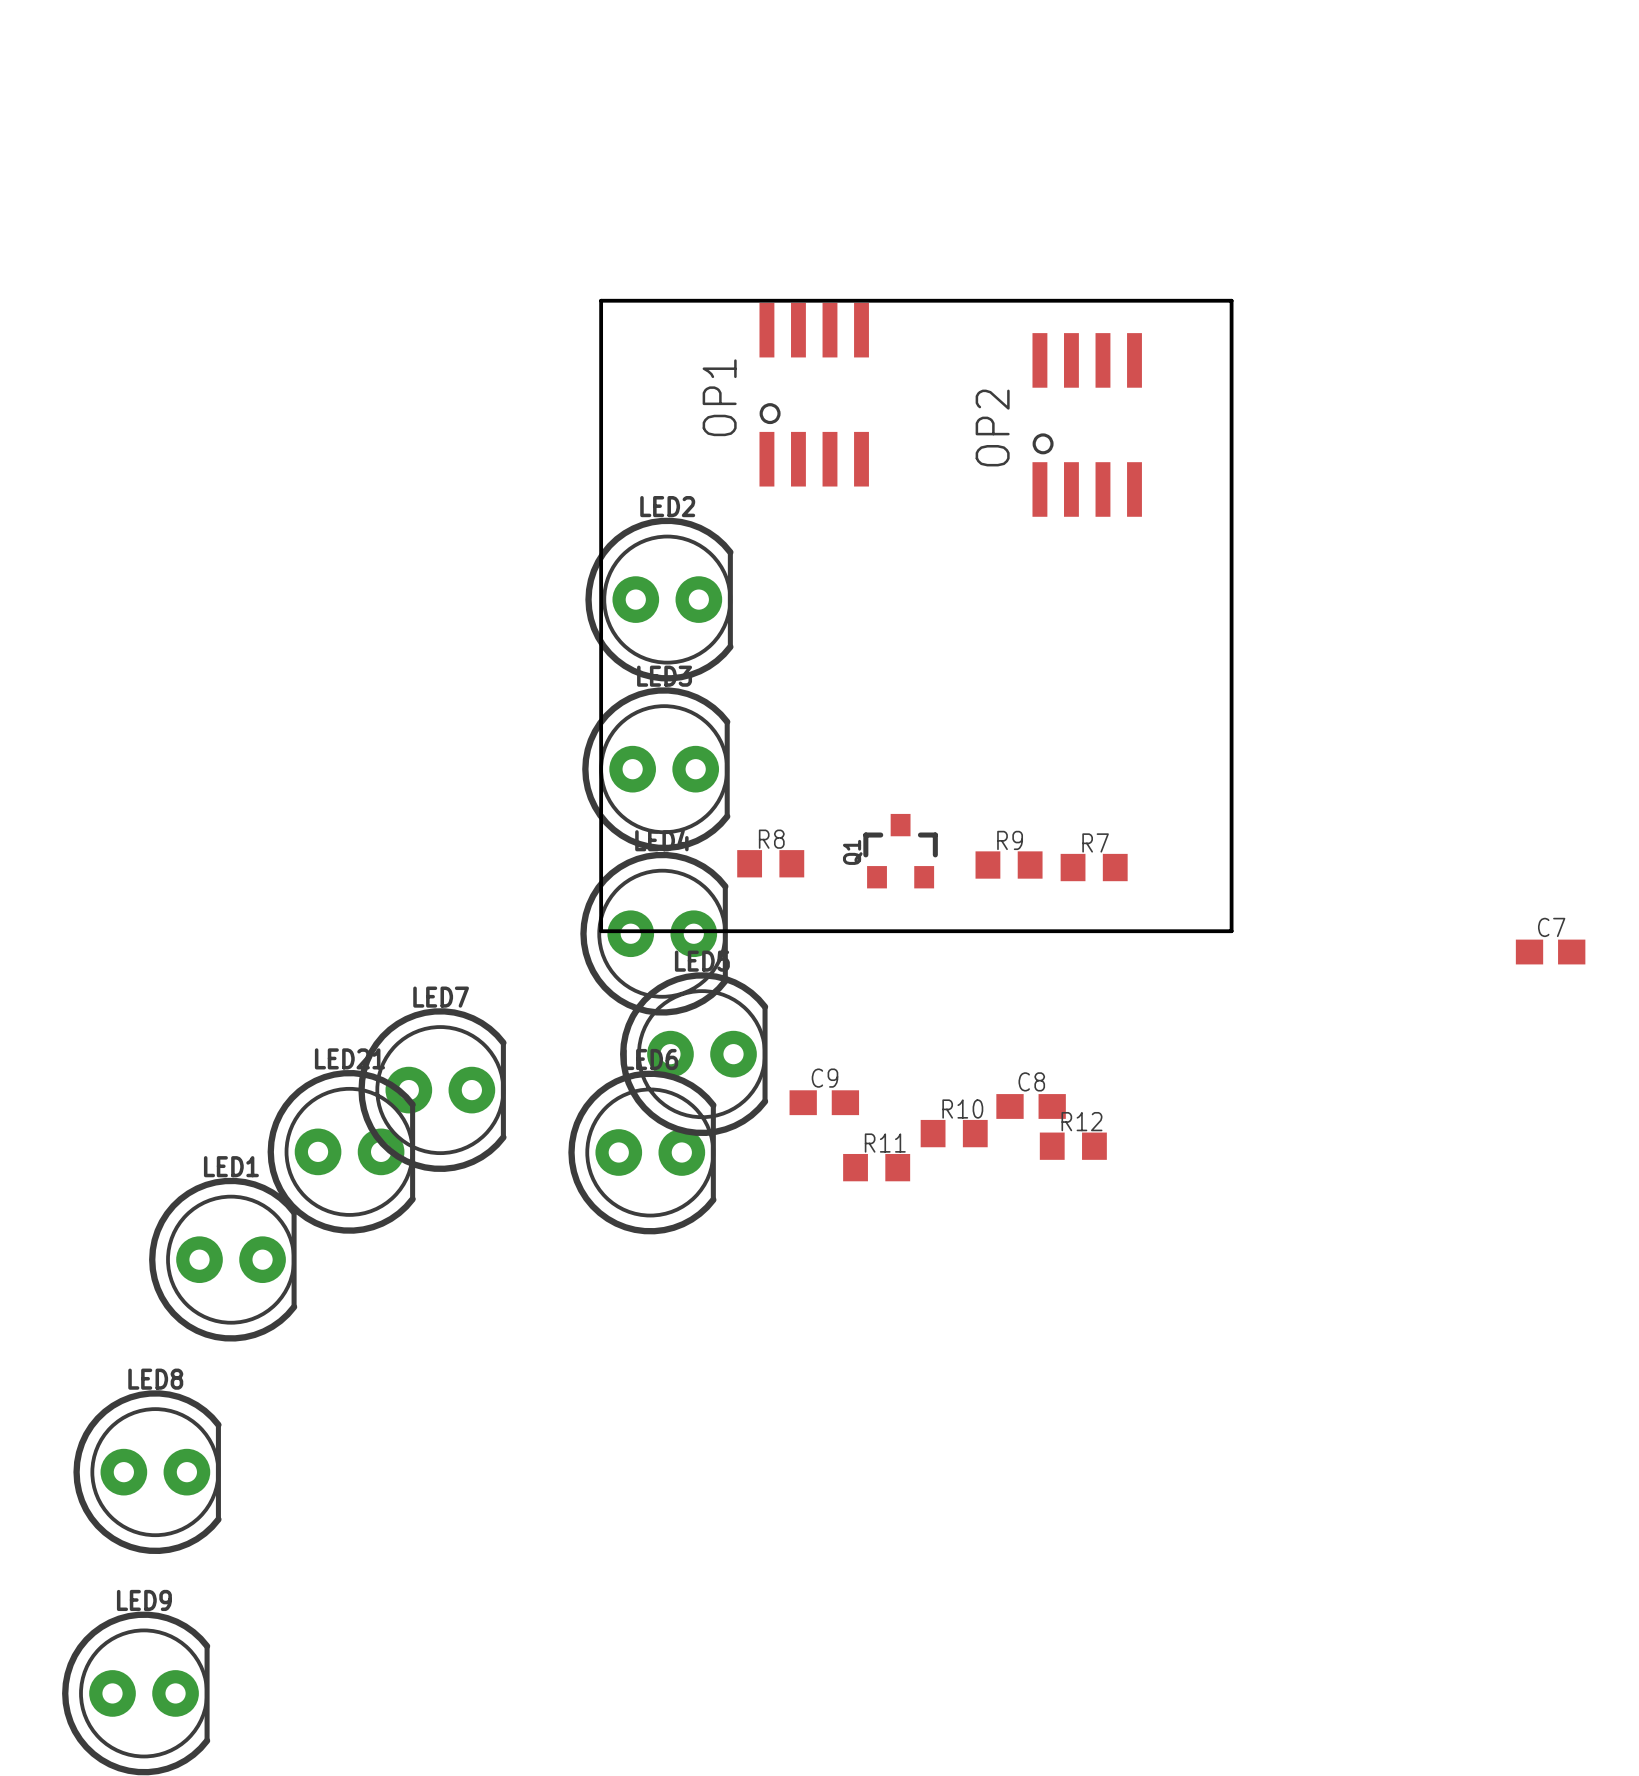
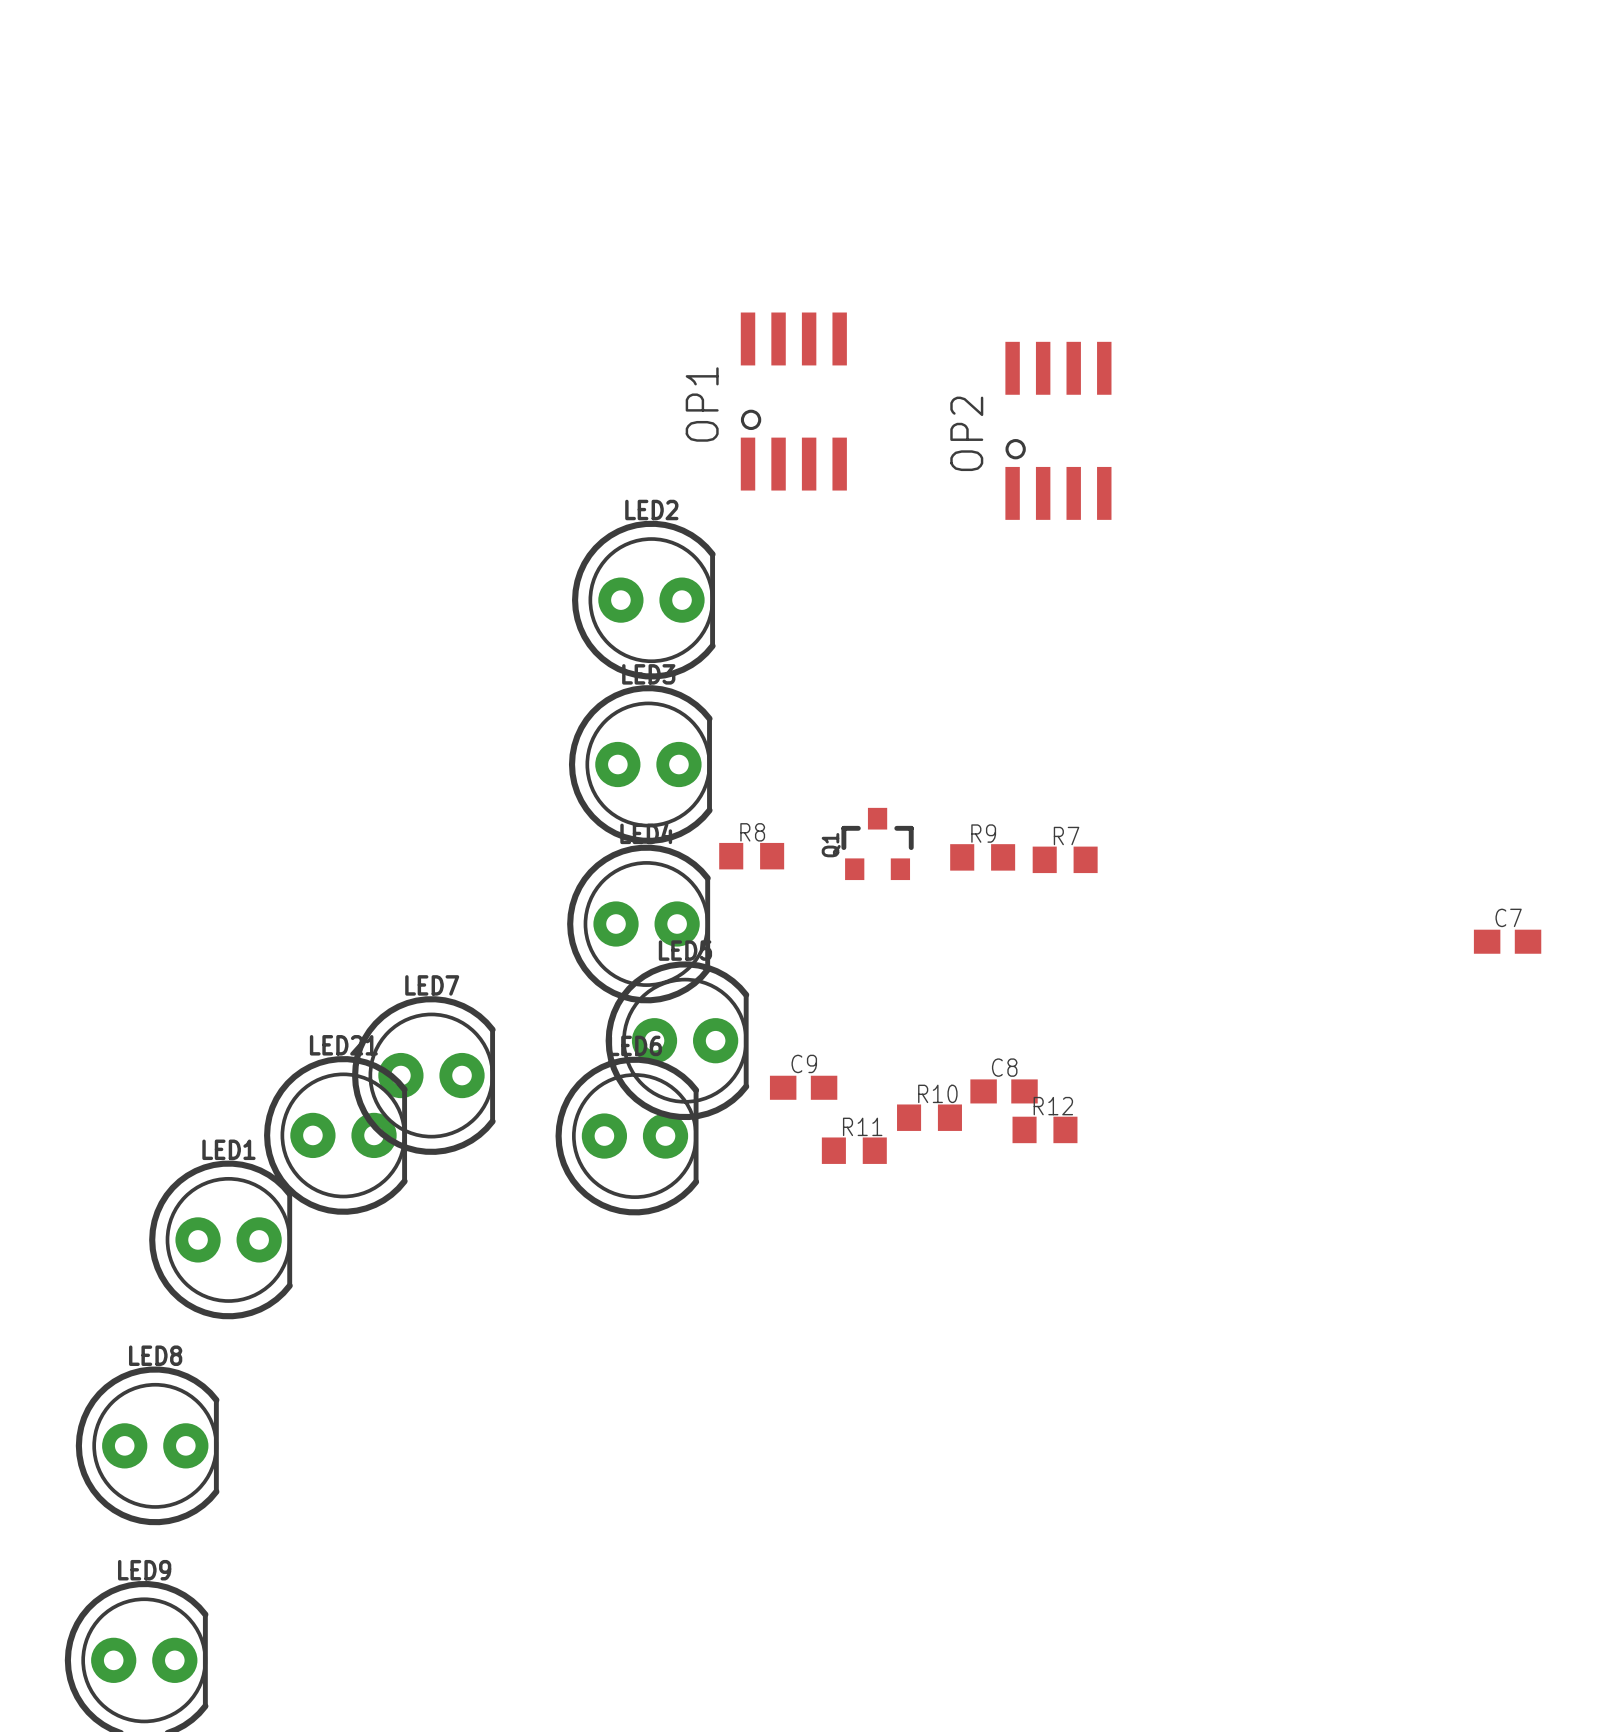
board edge: (601, 300) (1231, 300) (1231, 931) (601, 931) (601, 300) -> none

